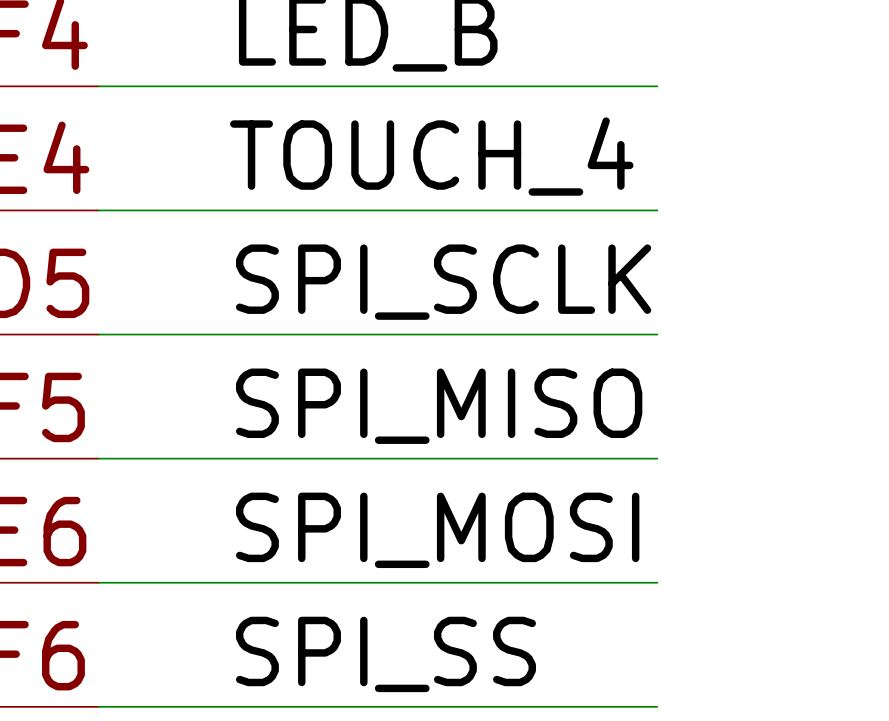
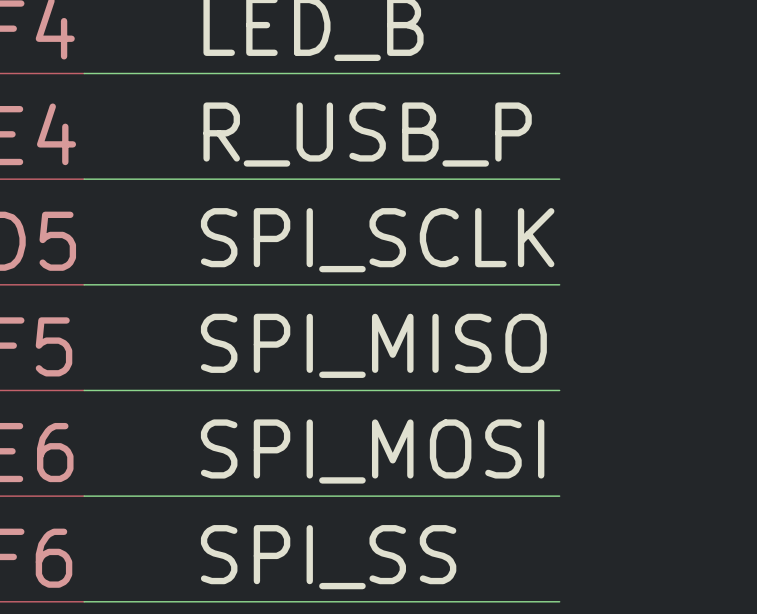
label: TOUCH_4 (431, 156) -> R_USB_P (367, 134)

